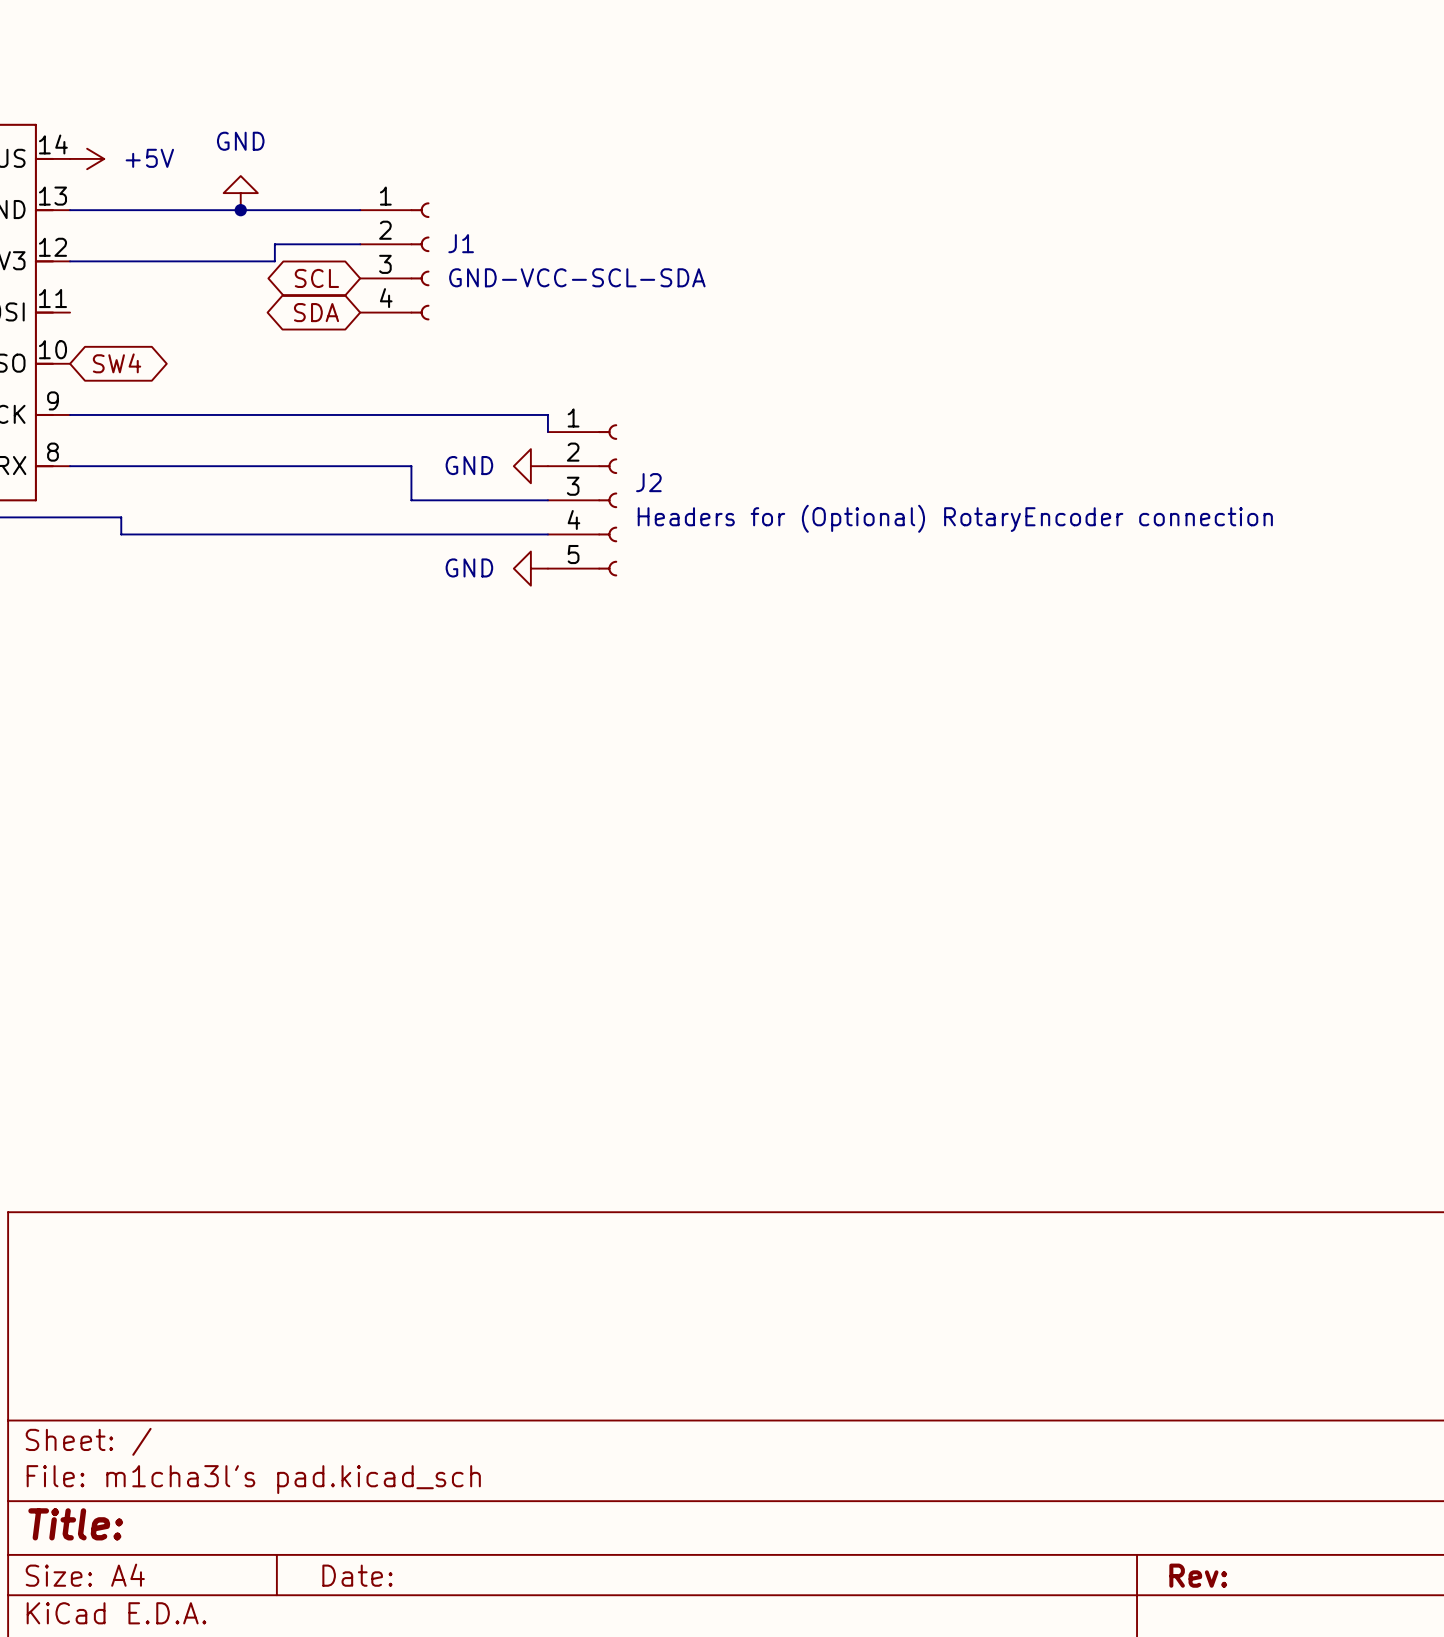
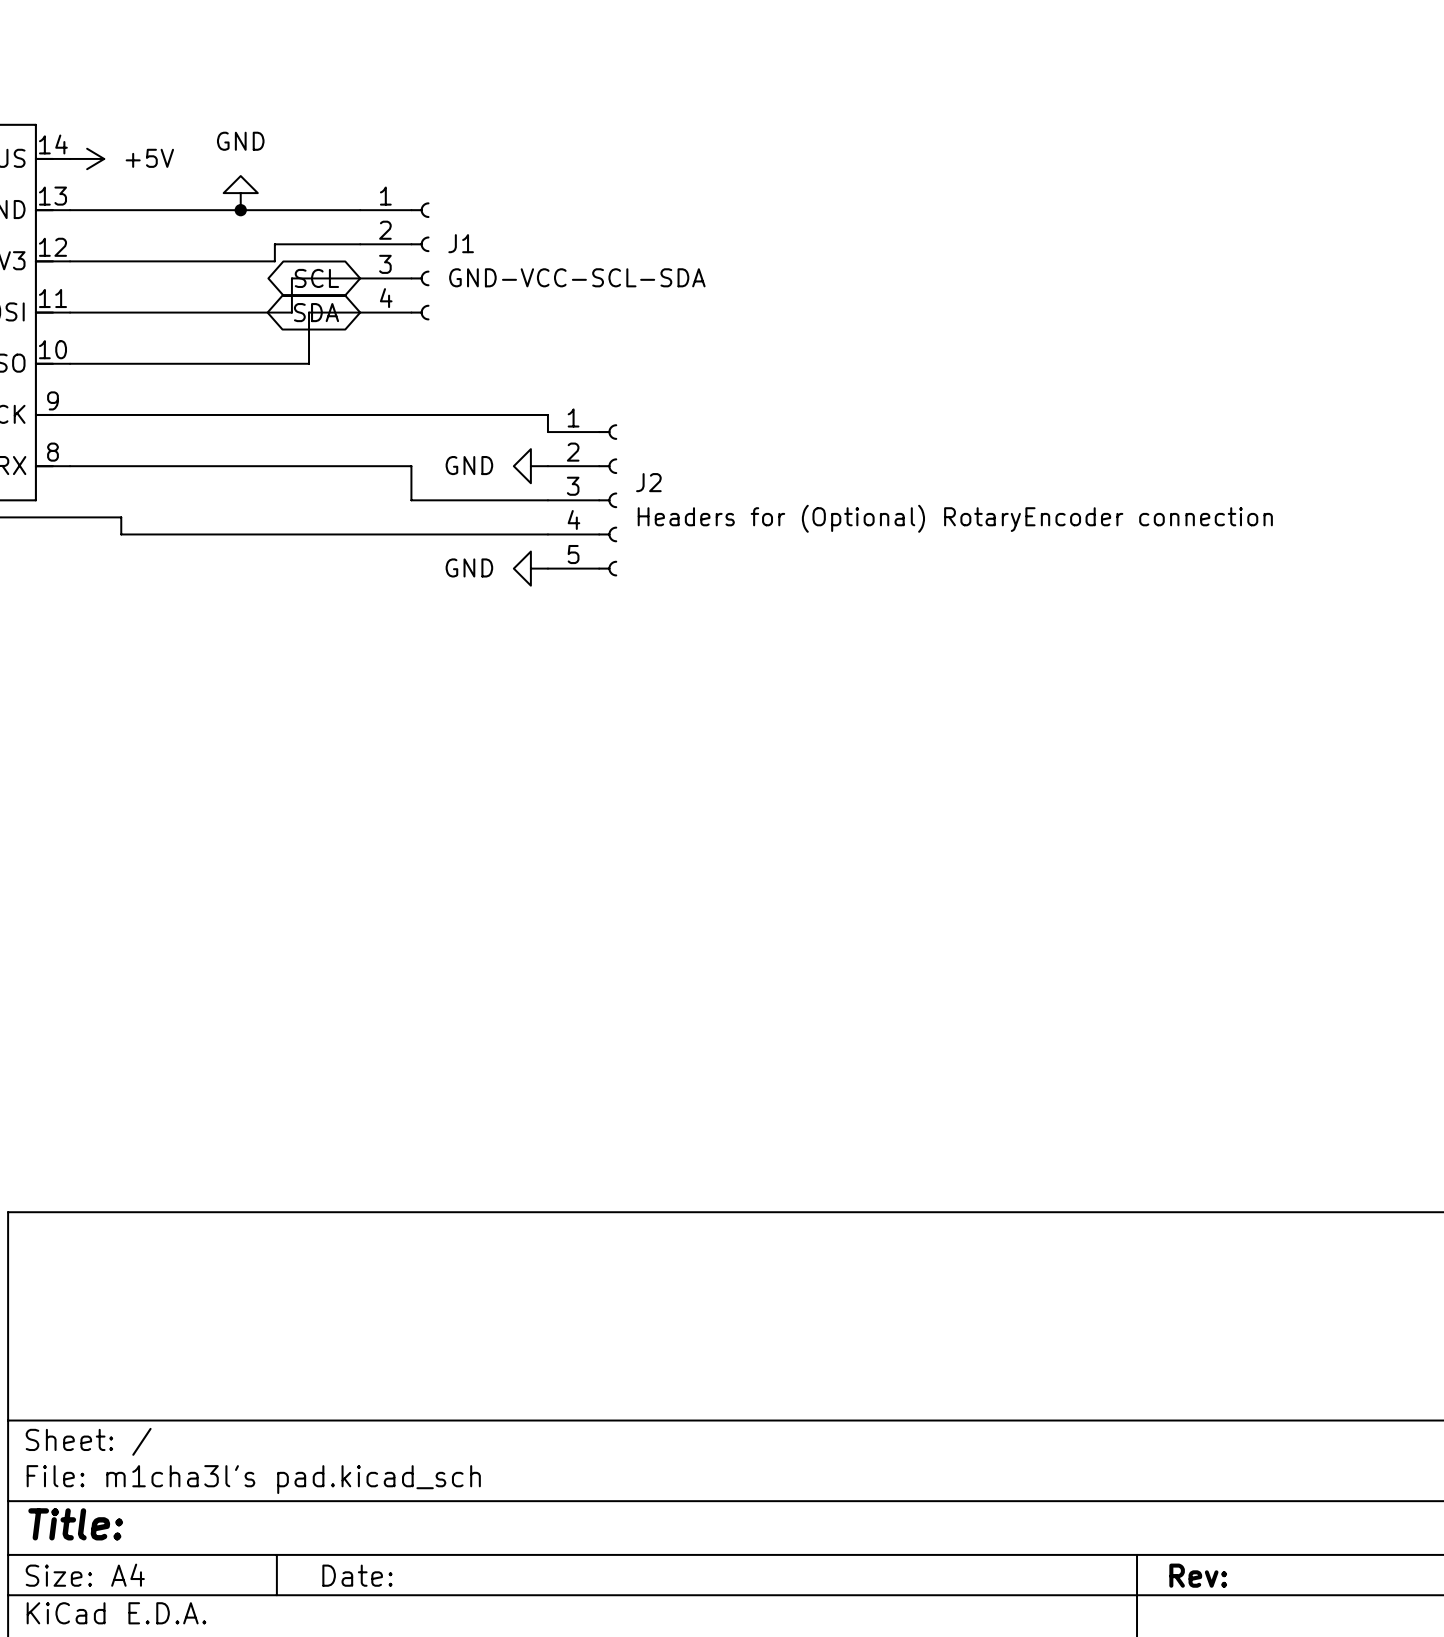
wire: none -> (360, 278) (291, 278) (291, 312) (70, 312)
wire: none -> (360, 312) (309, 312) (309, 363) (70, 363)
global label: SW4 (117, 363) -> none

